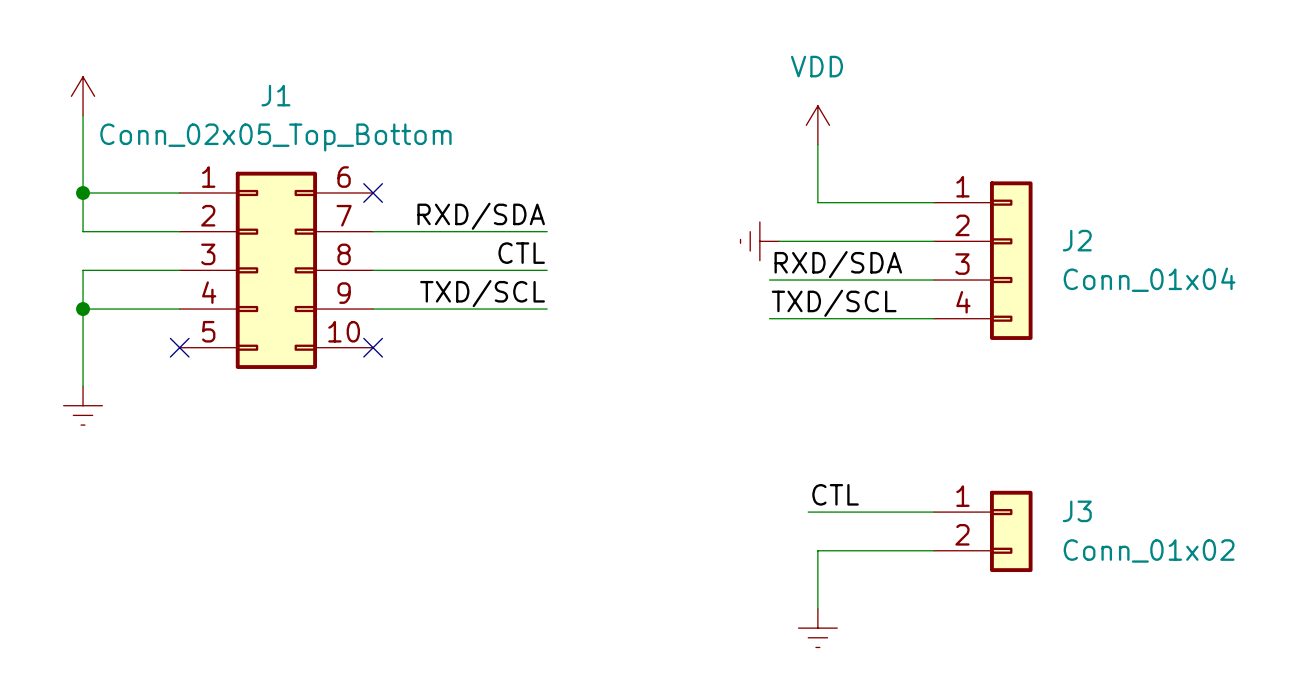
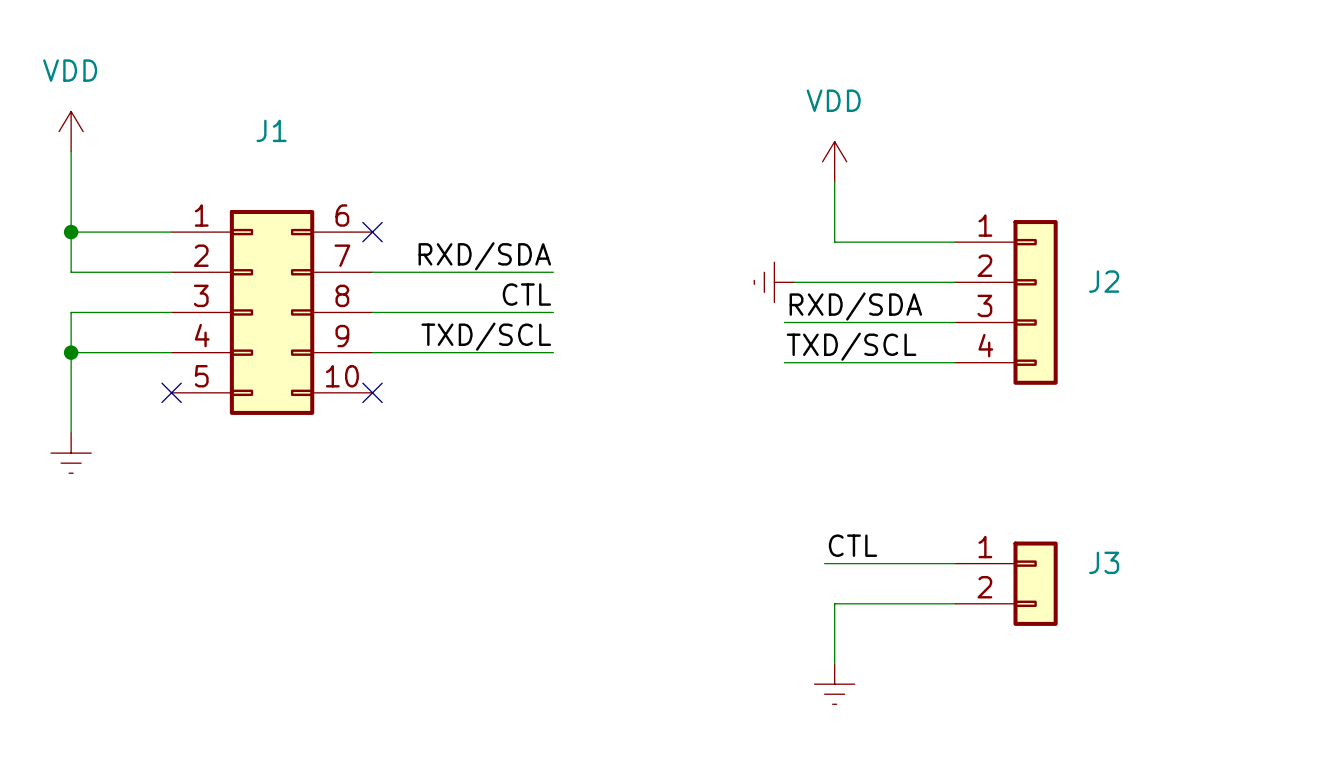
power symbol text: none -> VDD (70, 70)
J1 value: Conn_02x05_Top_Bottom (275, 137) -> none
J2 value: Conn_01x04 (1149, 279) -> none
J3 value: Conn_01x02 (1149, 550) -> none

